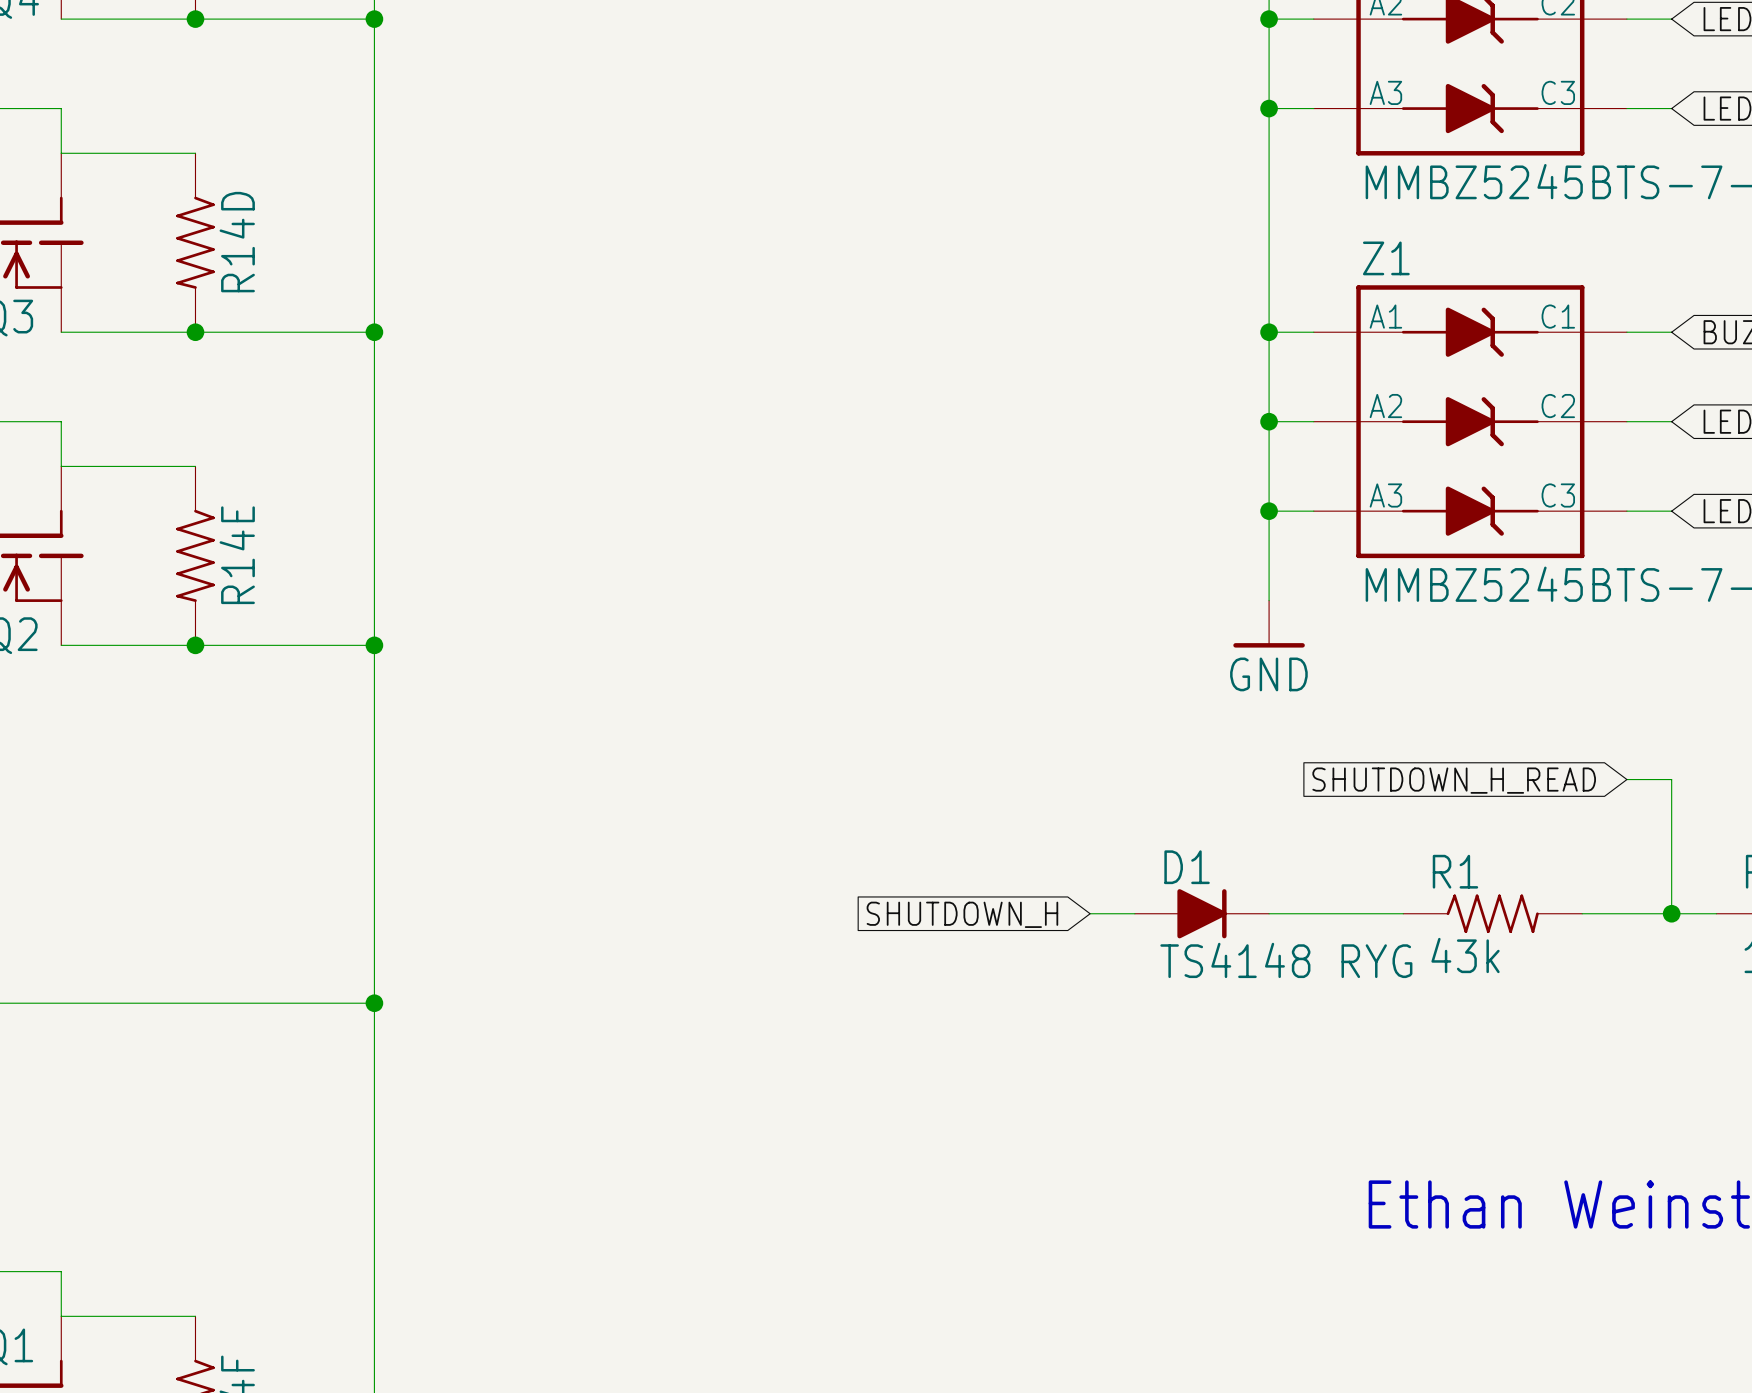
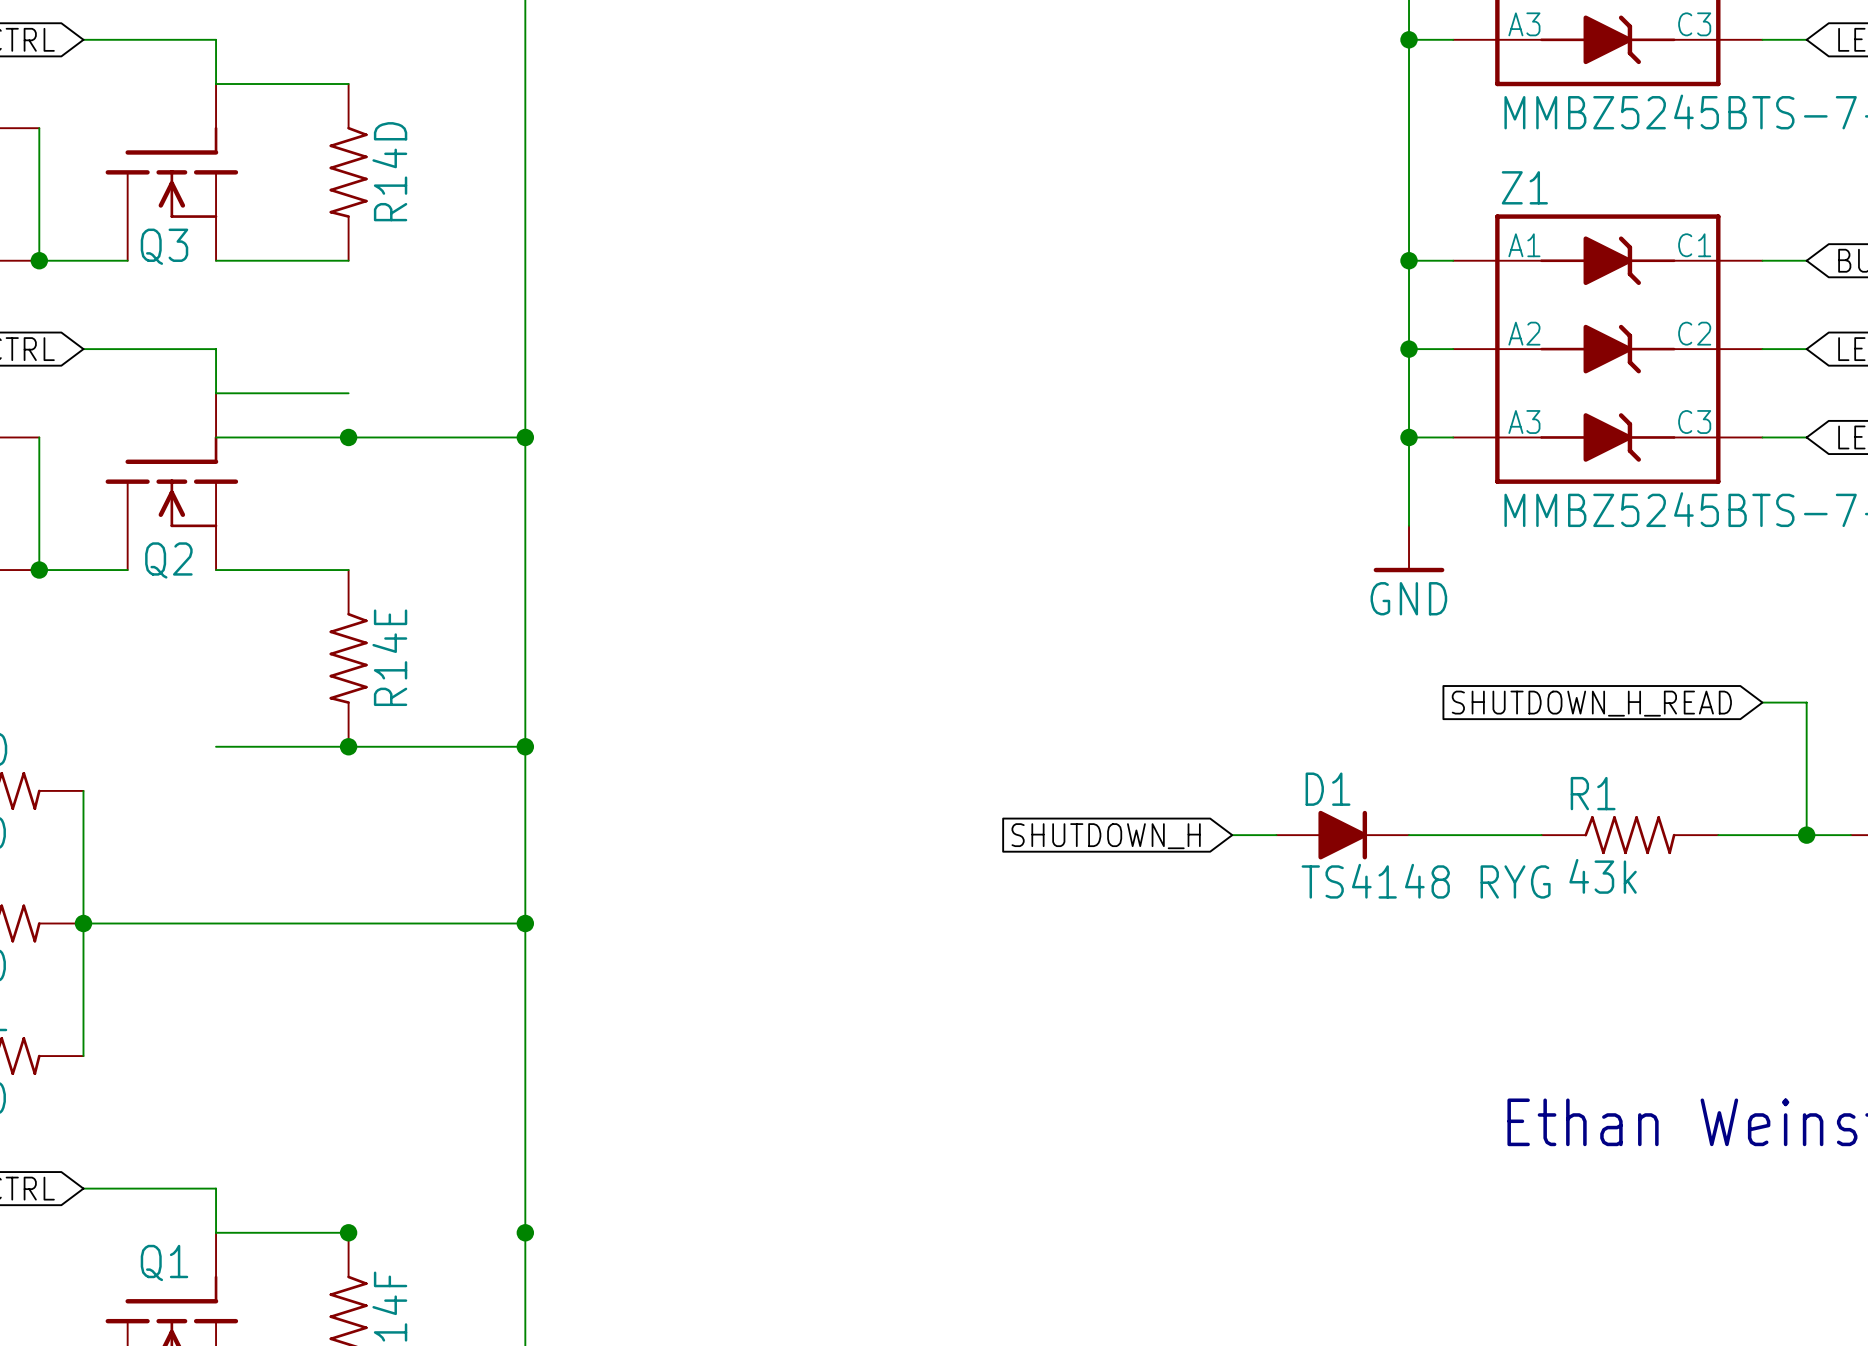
wire: (195, 332) (374, 332) -> none
junction: (195, 332) -> none
junction: (374, 332) -> none
wire: none -> (216, 437) (525, 437)
junction: none -> (348, 437)
junction: none -> (525, 437)
R14E position: (195, 555) -> (348, 658)
wire: (195, 645) (374, 645) -> none
junction: (195, 645) -> none
junction: (374, 645) -> none
wire: none -> (216, 746) (525, 746)
junction: none -> (348, 746)
junction: none -> (525, 746)
junction: none -> (348, 1232)
junction: none -> (525, 1232)

